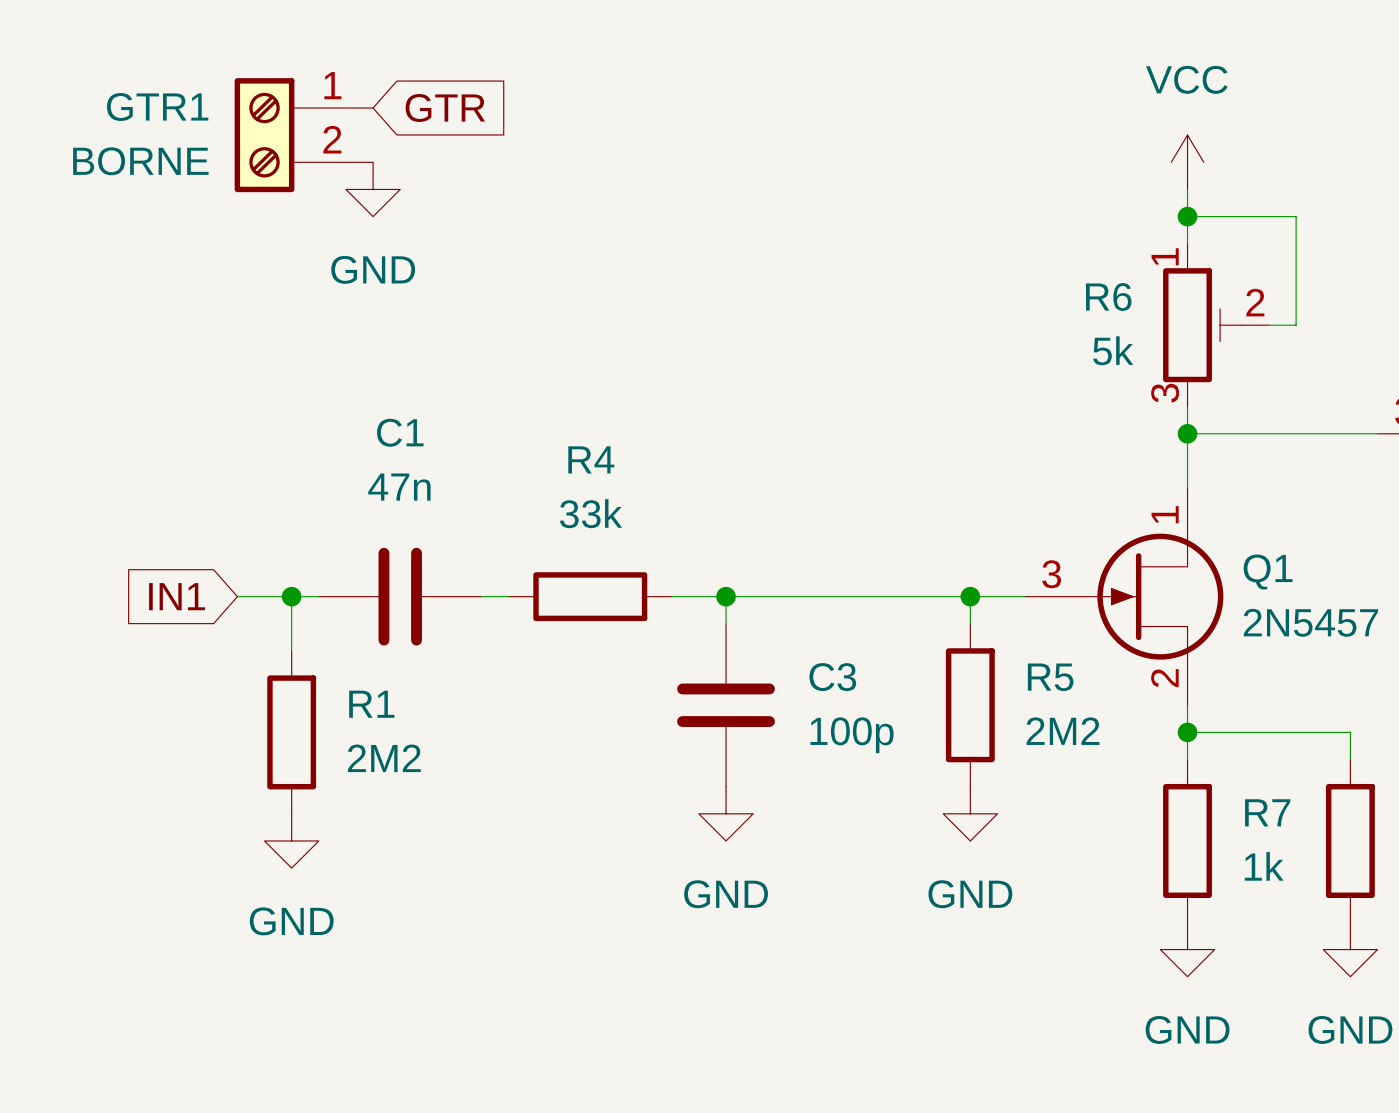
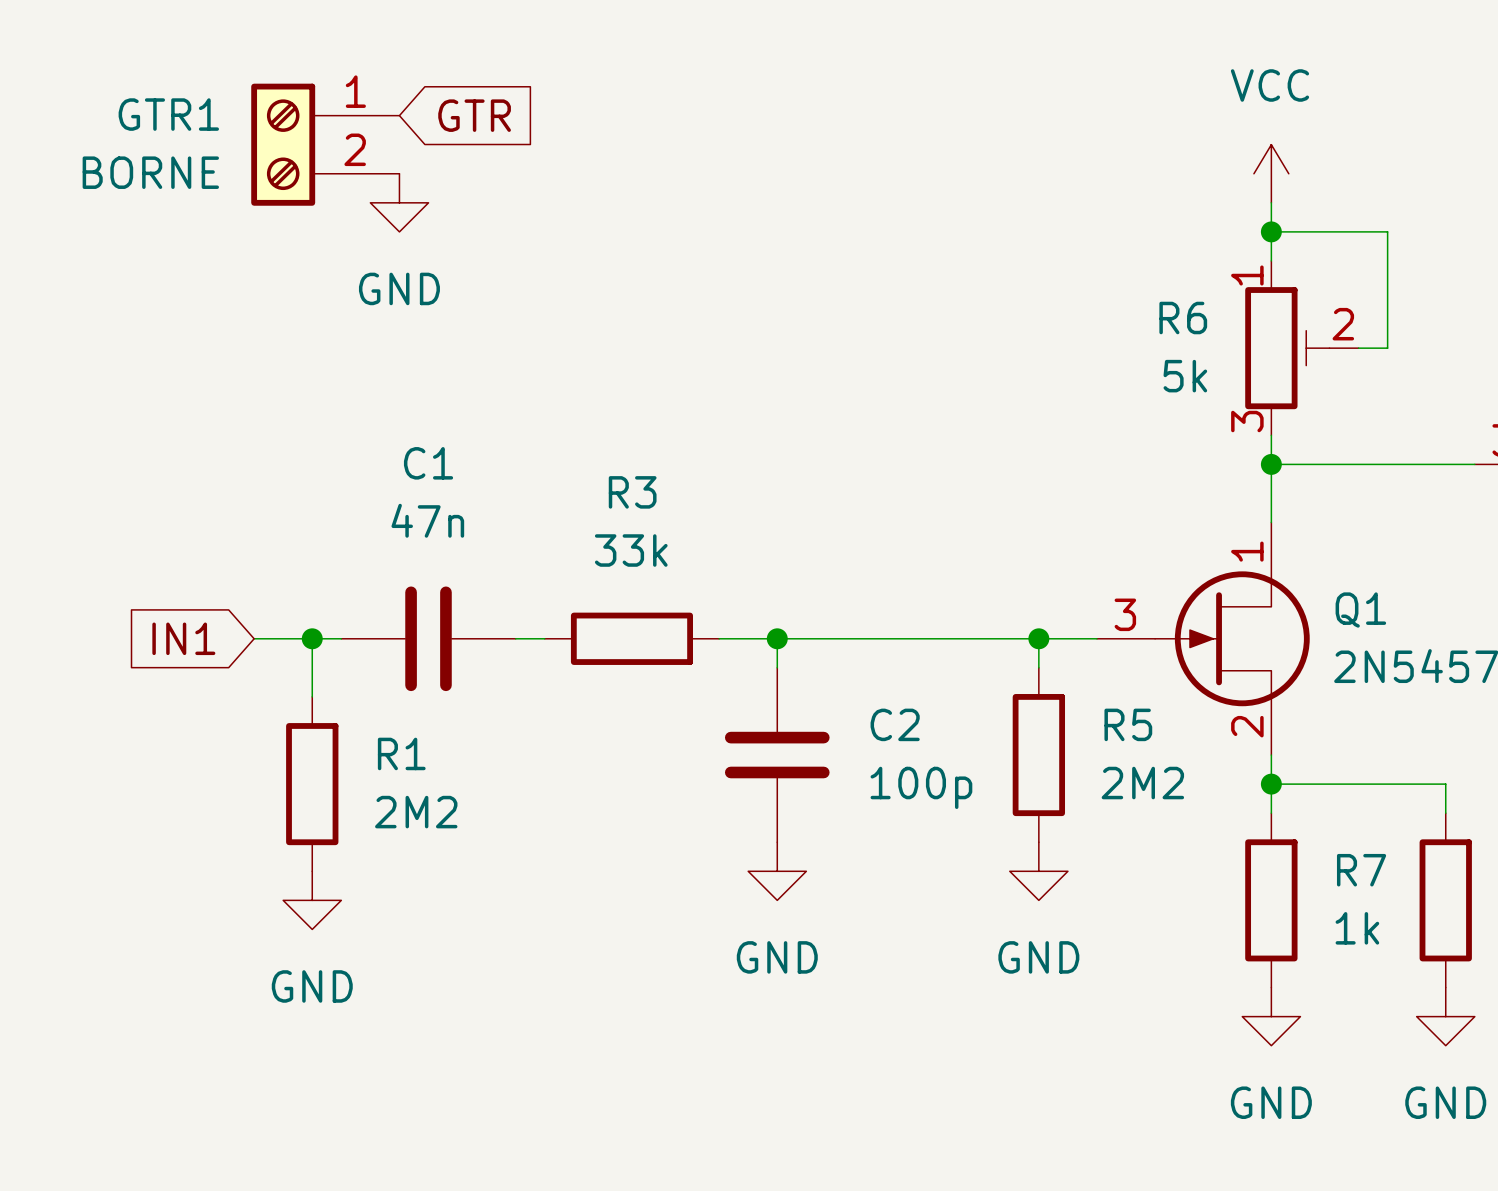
R4 name: R4 (591, 459) -> R3 (632, 492)
C3 name: C3 (832, 677) -> C2 (895, 724)

